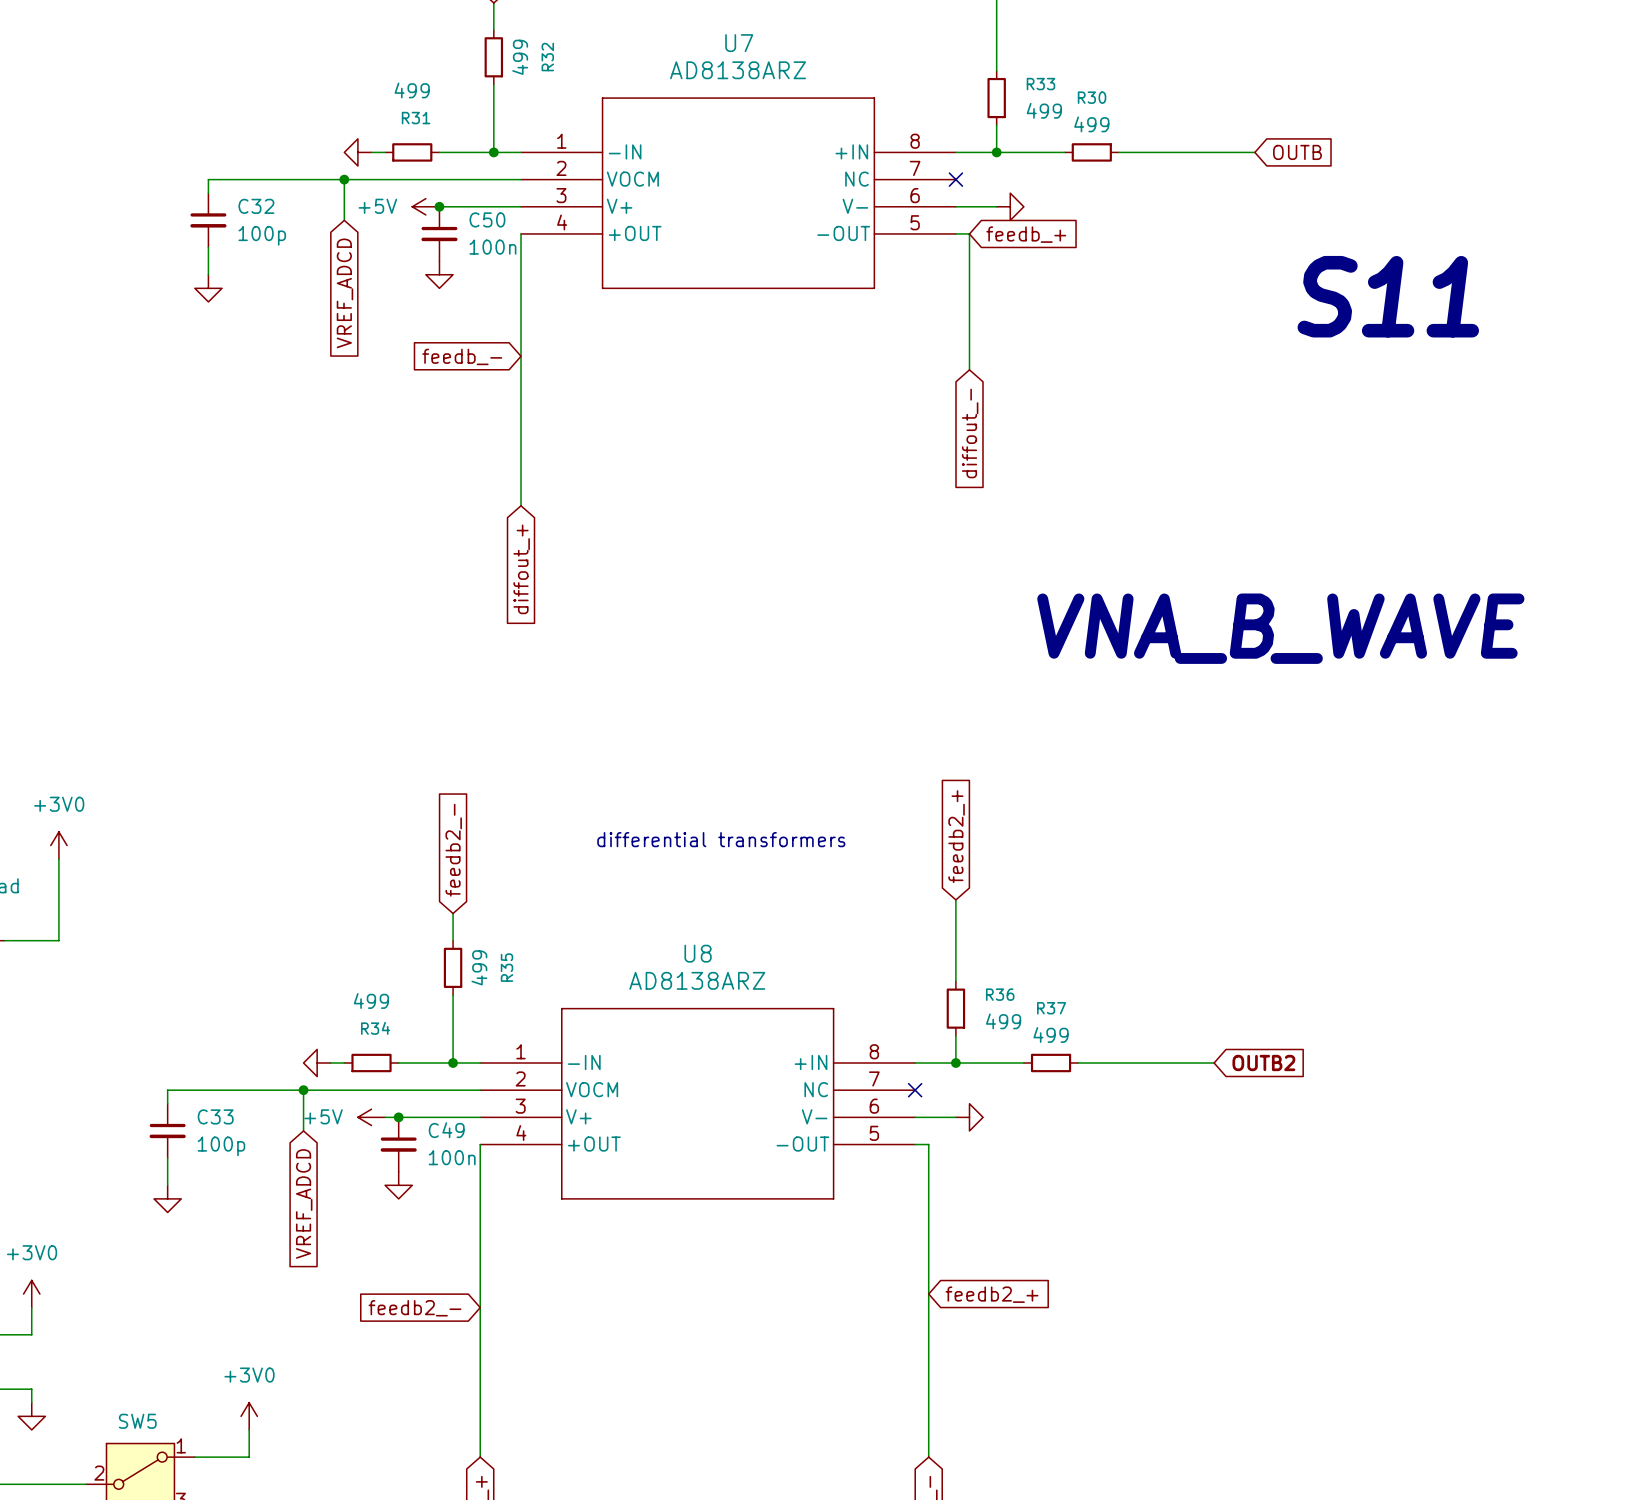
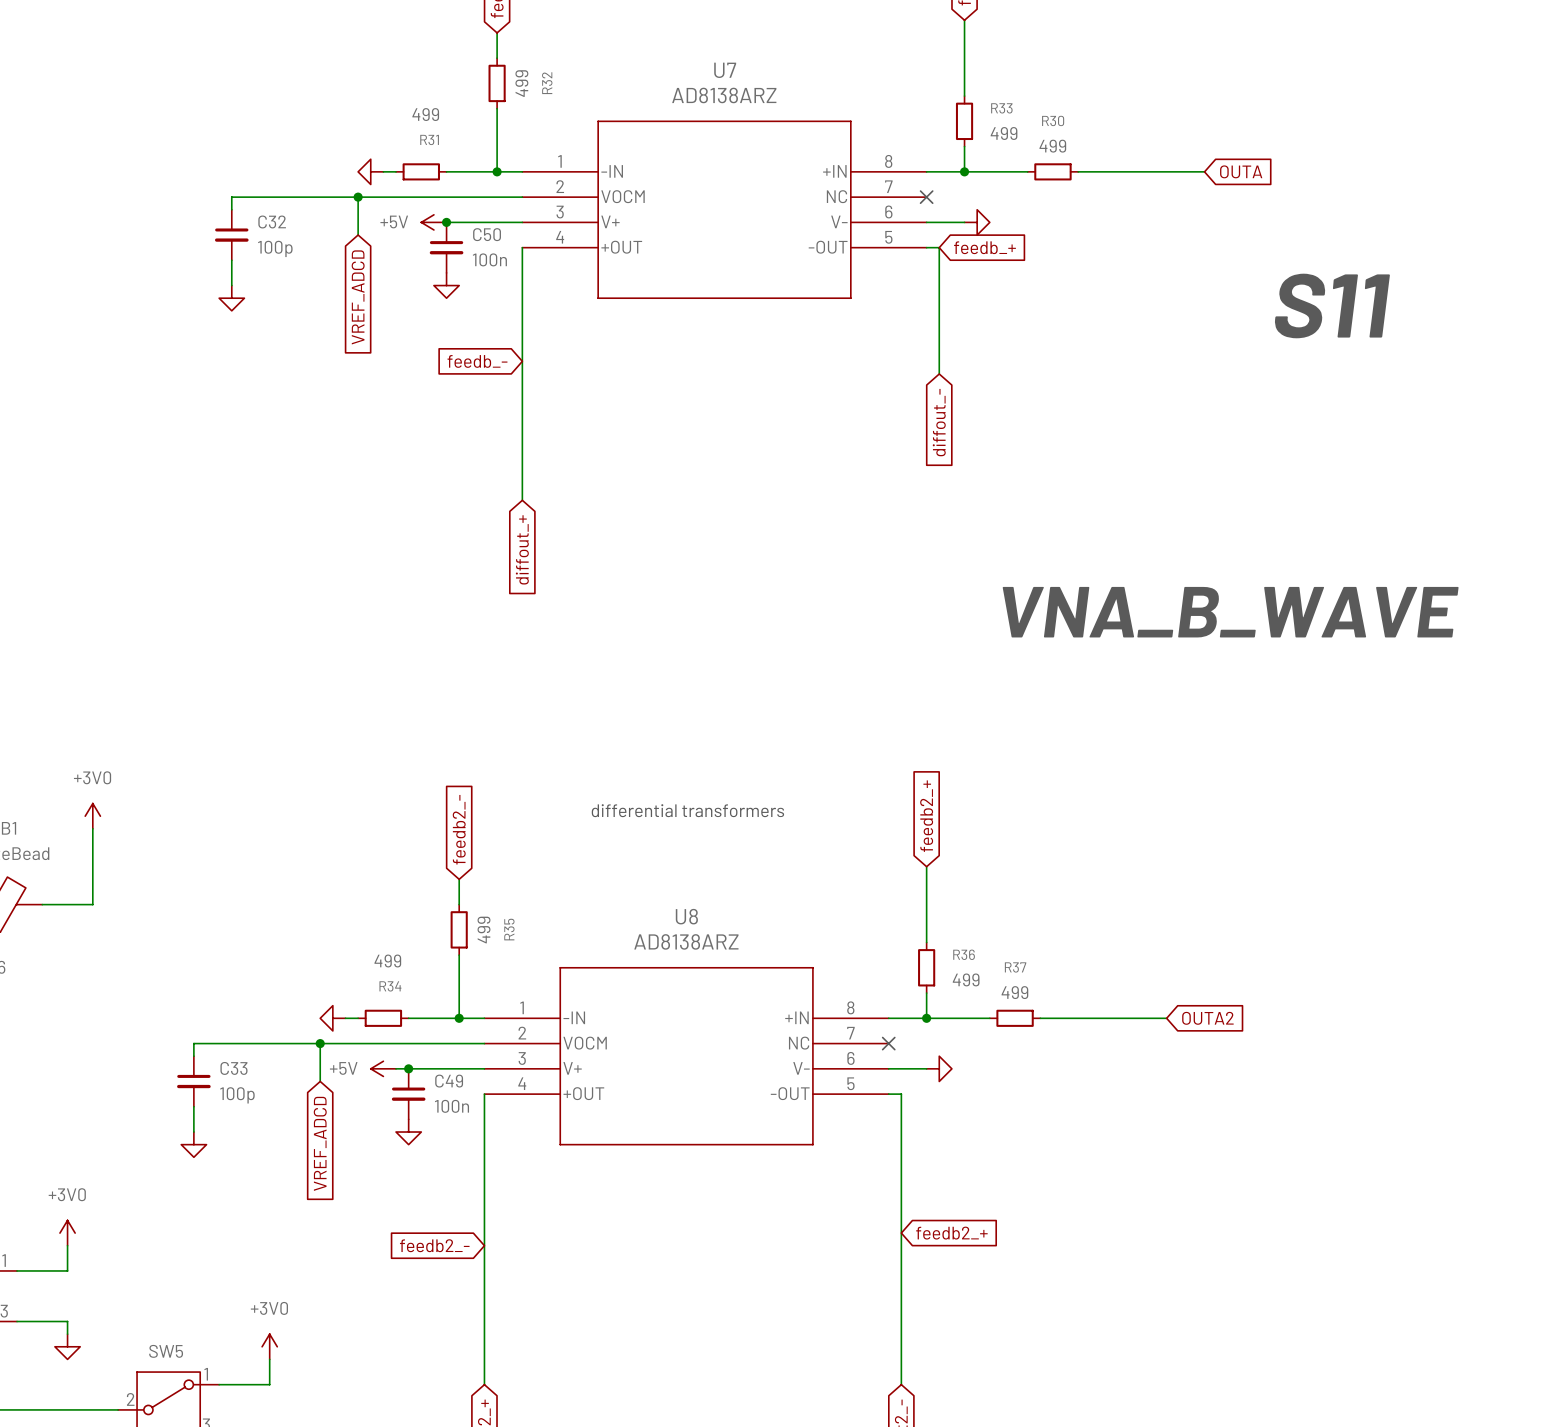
global label: OUTB (1297, 152) -> OUTA (1241, 171)
global label: OUTB2 (1263, 1062) -> OUTA2 (1207, 1018)

